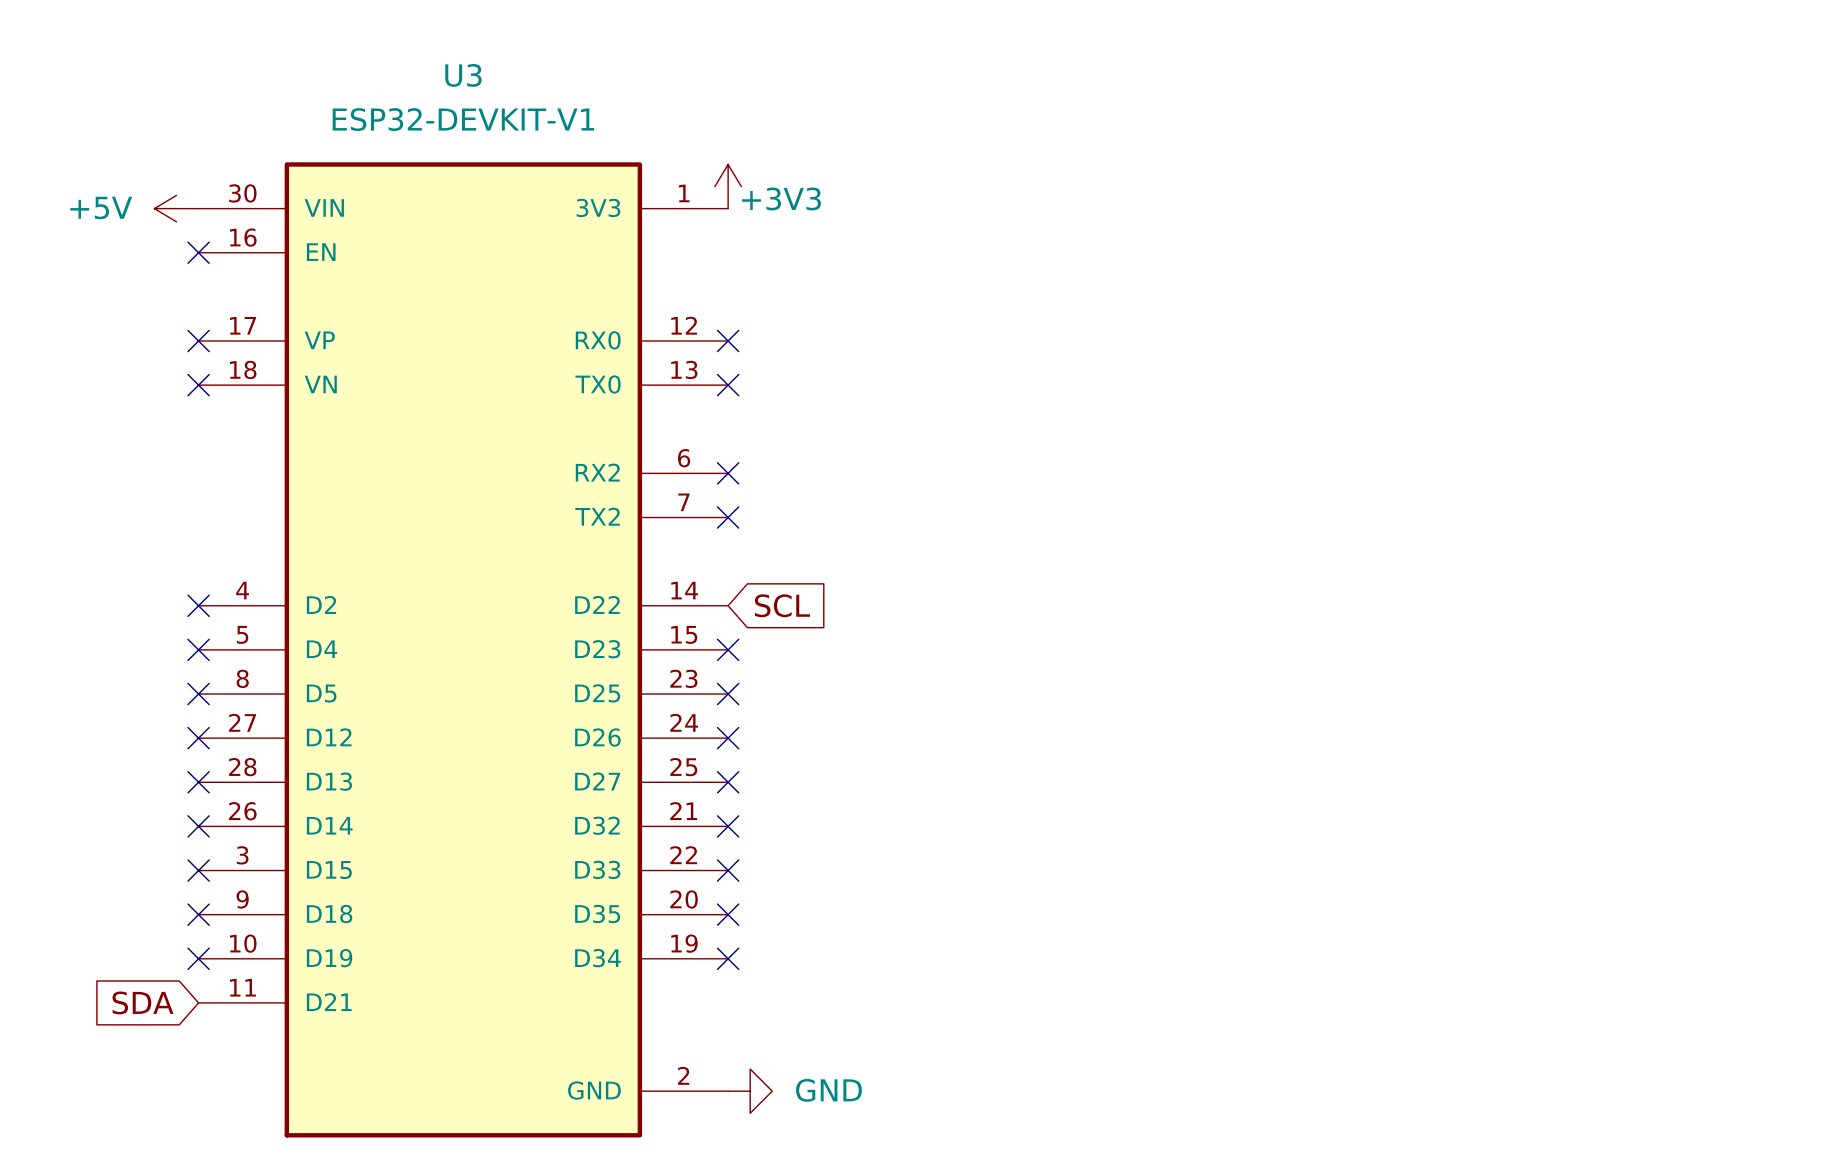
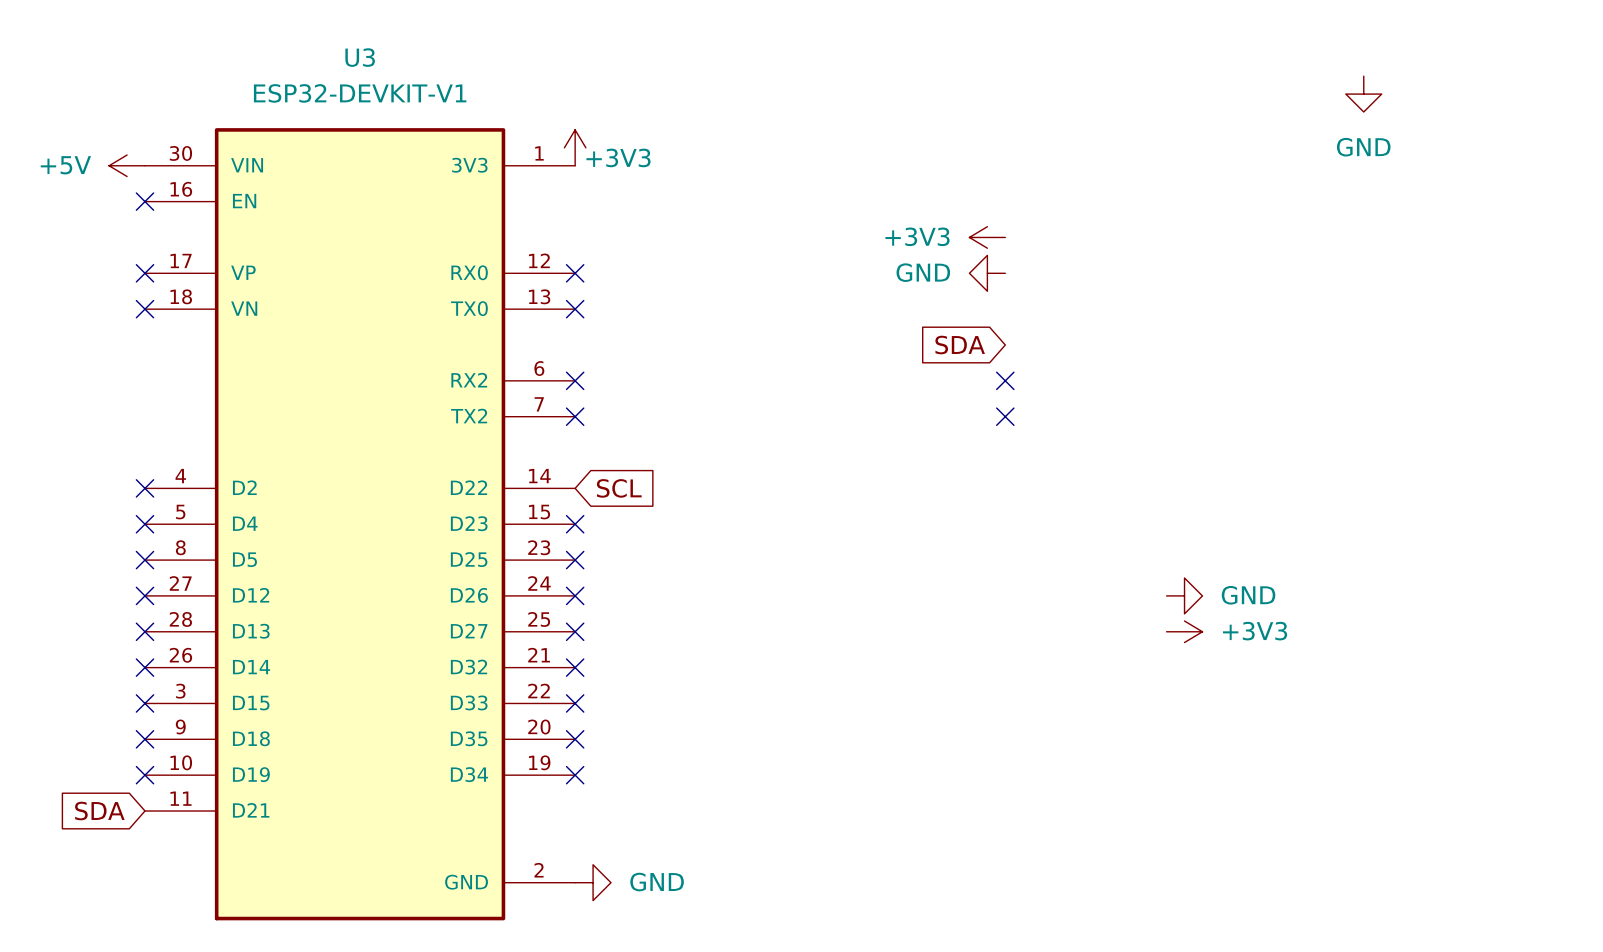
power symbol: none -> GND (1363, 94)
power symbol: none -> +3V3 (987, 237)
power symbol: none -> GND (987, 273)
global label: none -> SDA (960, 345)
no-connect mark: none -> (1005, 380)
no-connect mark: none -> (1005, 416)
power symbol: none -> GND (1184, 595)
power symbol: none -> +3V3 (1184, 631)

